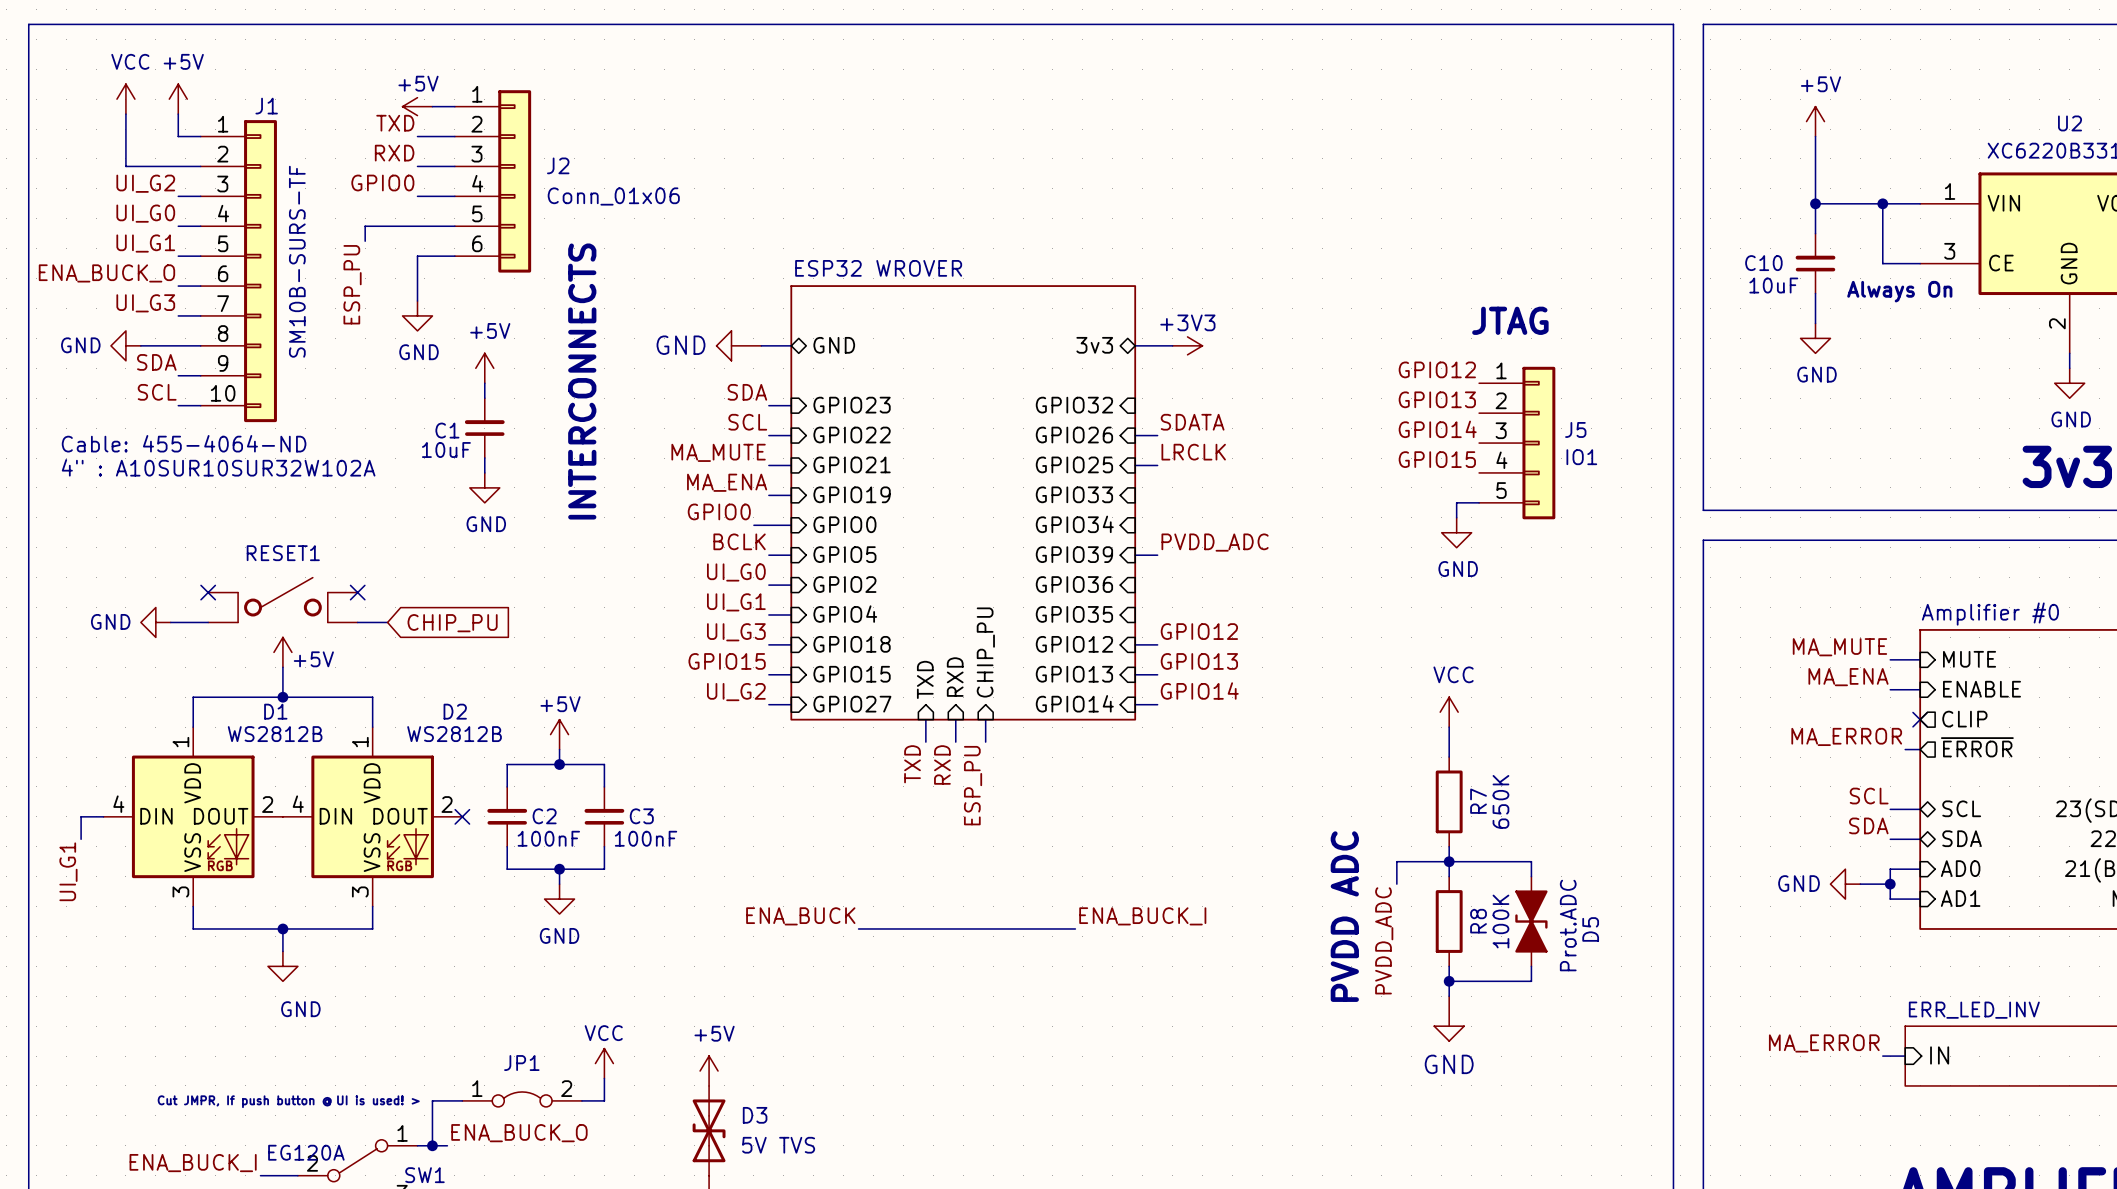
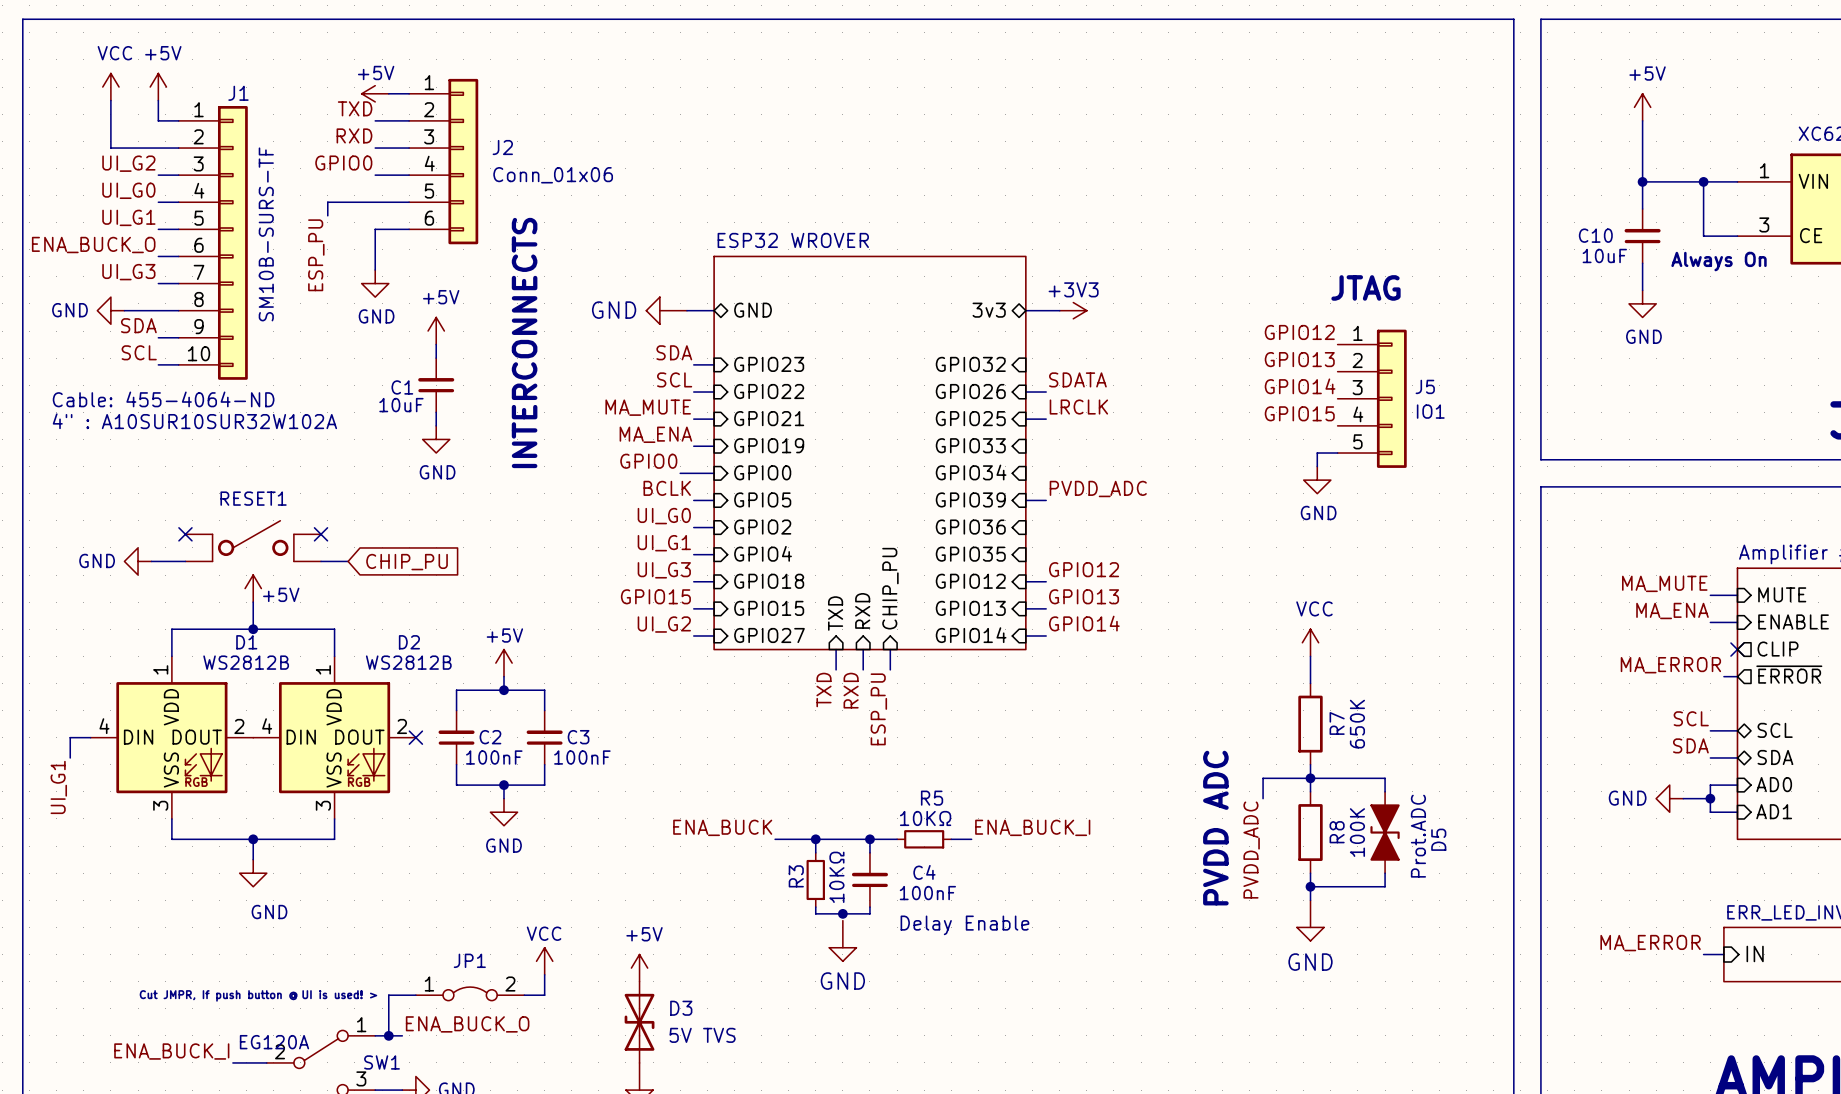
wire: none -> (815, 839) (815, 852)
junction: none -> (815, 839)
wire: none -> (869, 839) (869, 852)
junction: none -> (869, 839)
wire: (993, 928) (1052, 928) -> none
R5: none -> 10KΩ (924, 839)
R3: none -> 10KΩ (815, 879)
C4: none -> 100nF (869, 879)
wire: none -> (815, 907) (815, 913) (869, 913) (869, 907)
junction: none -> (842, 913)
text: none -> Delay Enable (964, 925)
power symbol: none -> GND (842, 940)

